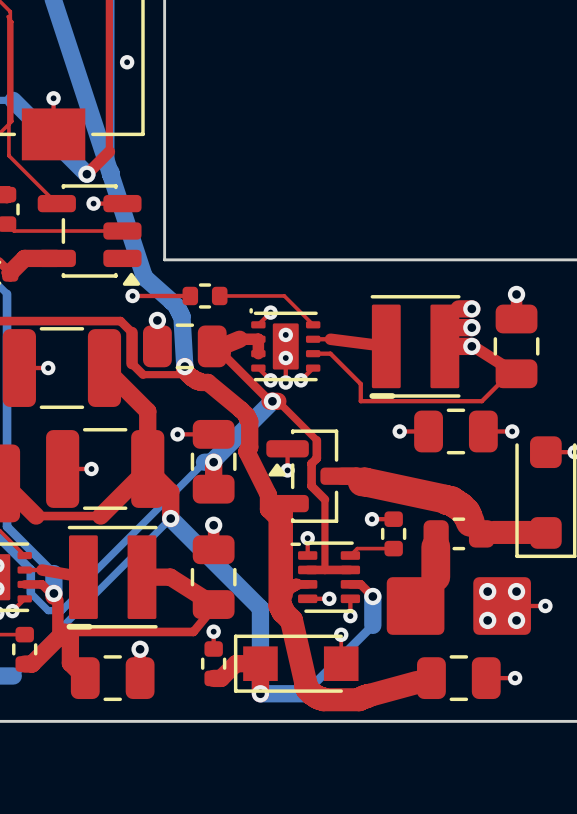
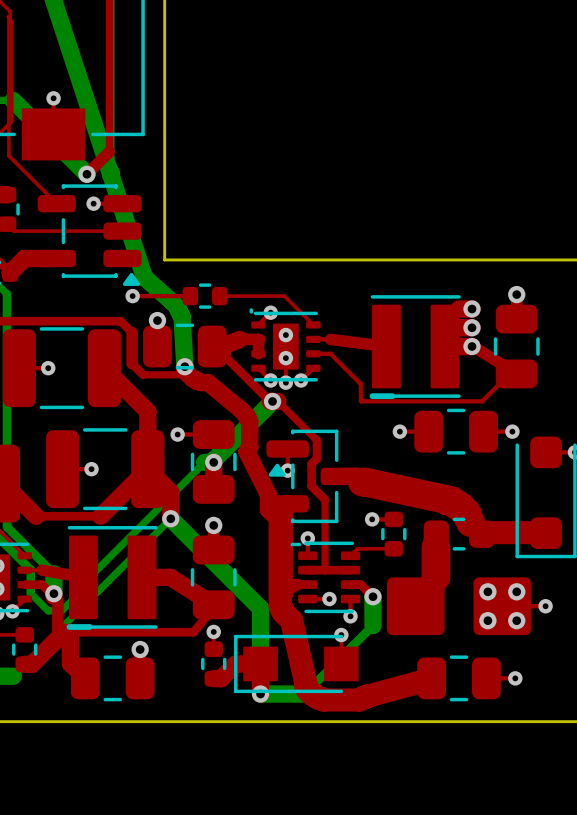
via: (127, 62) -> none

